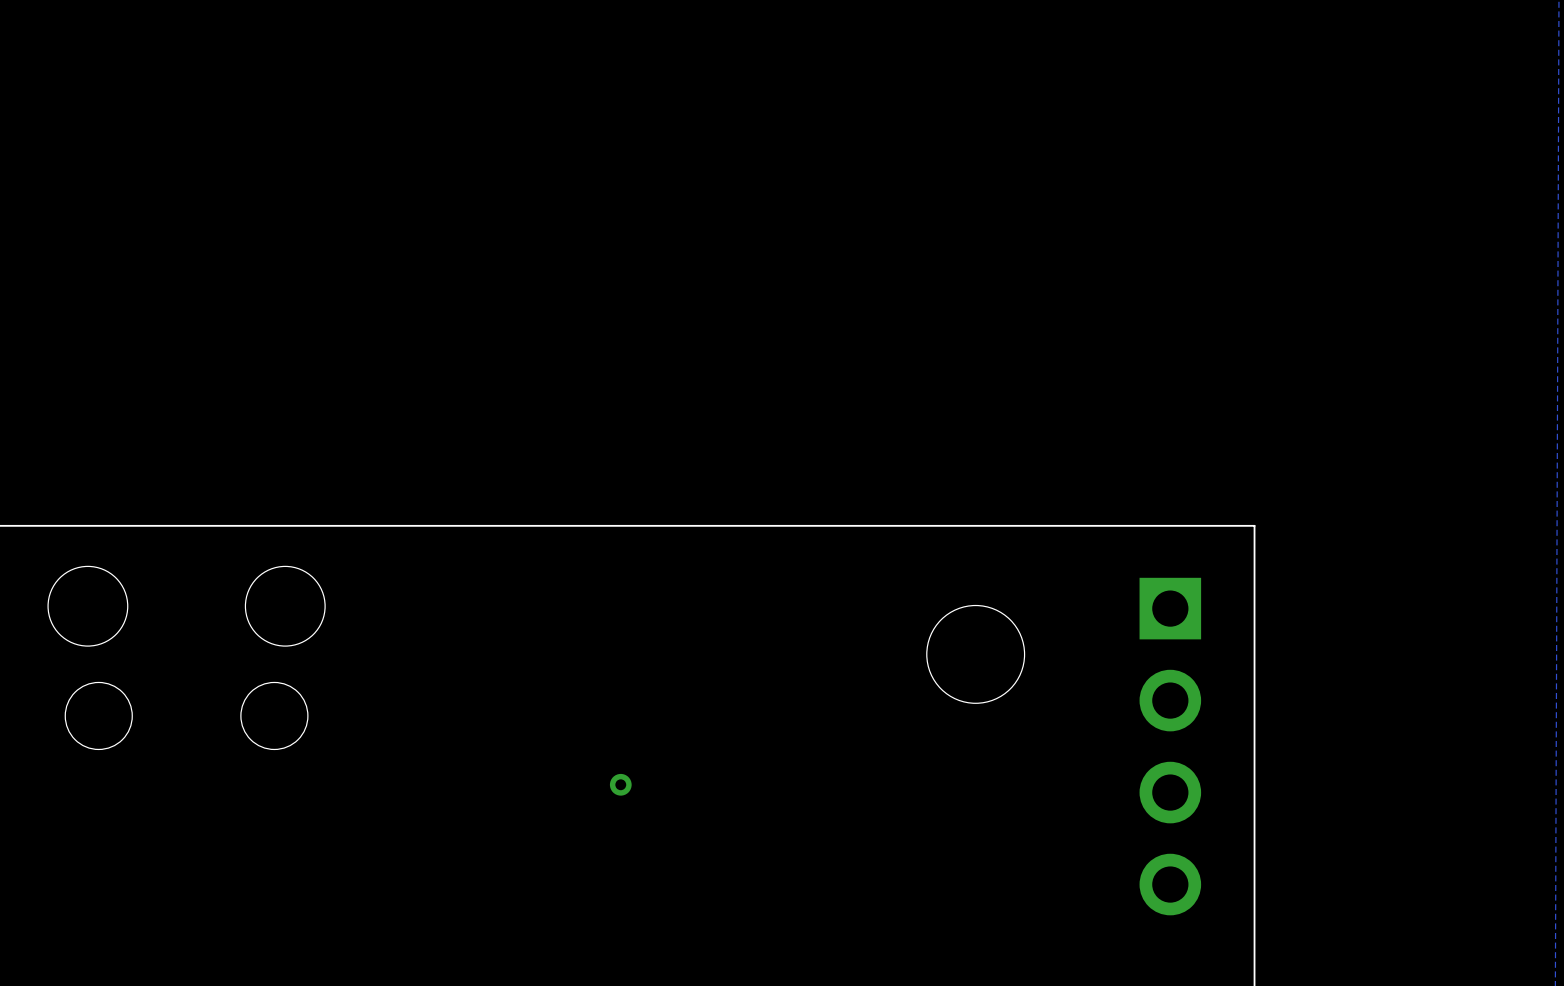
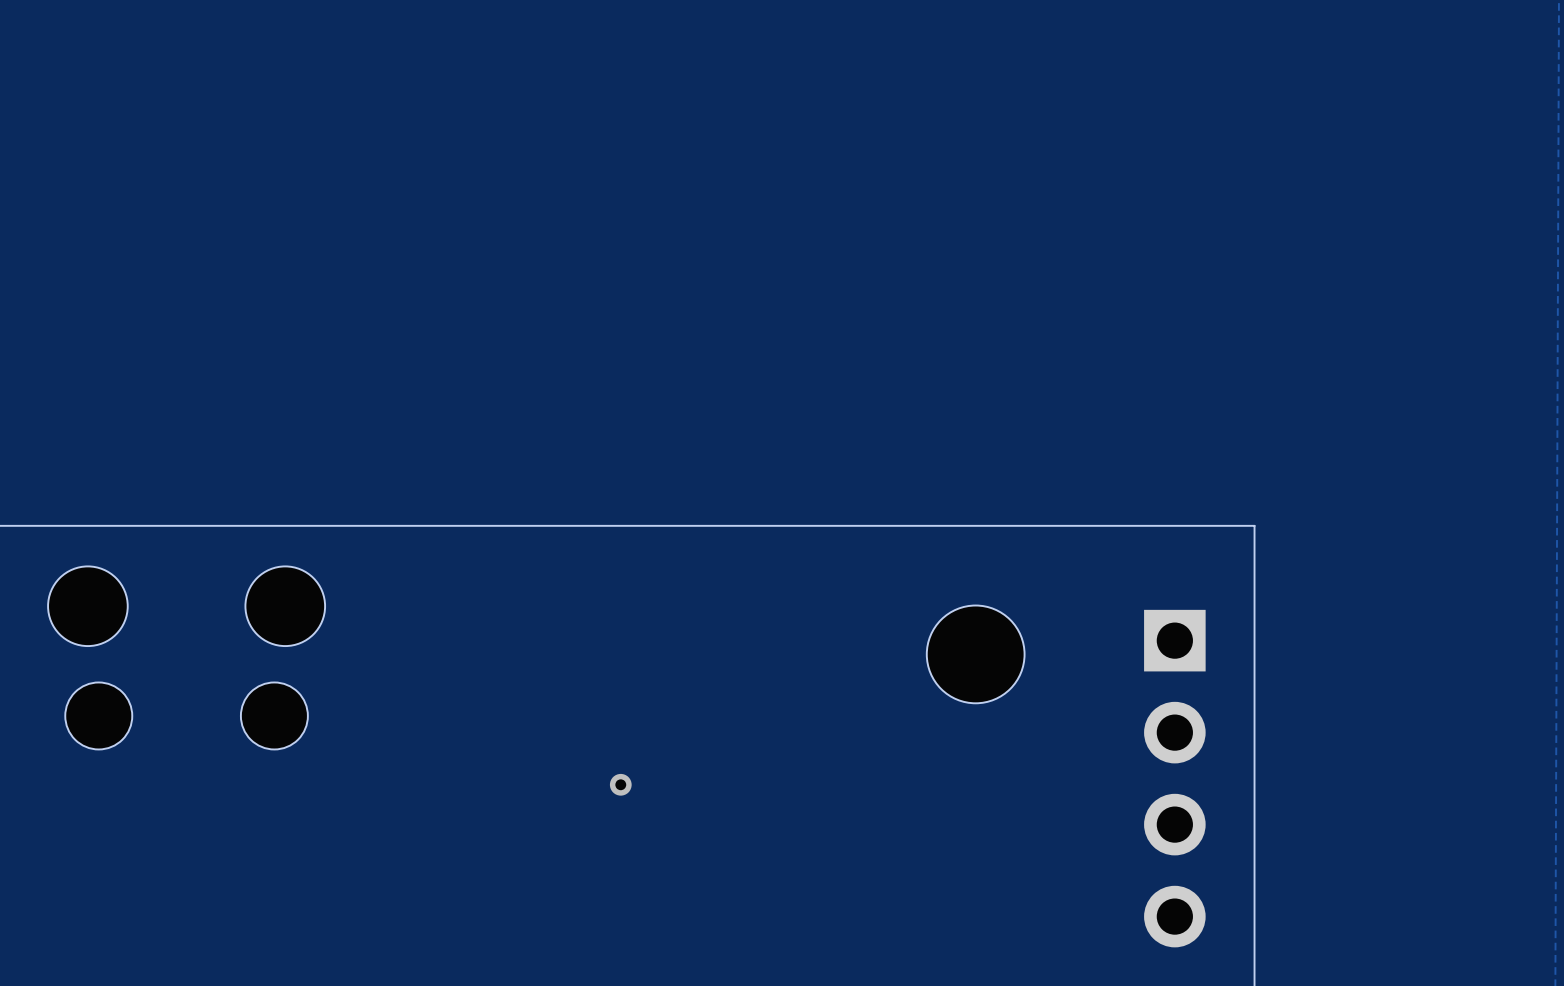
part position: (1170, 746) -> (1174, 778)

